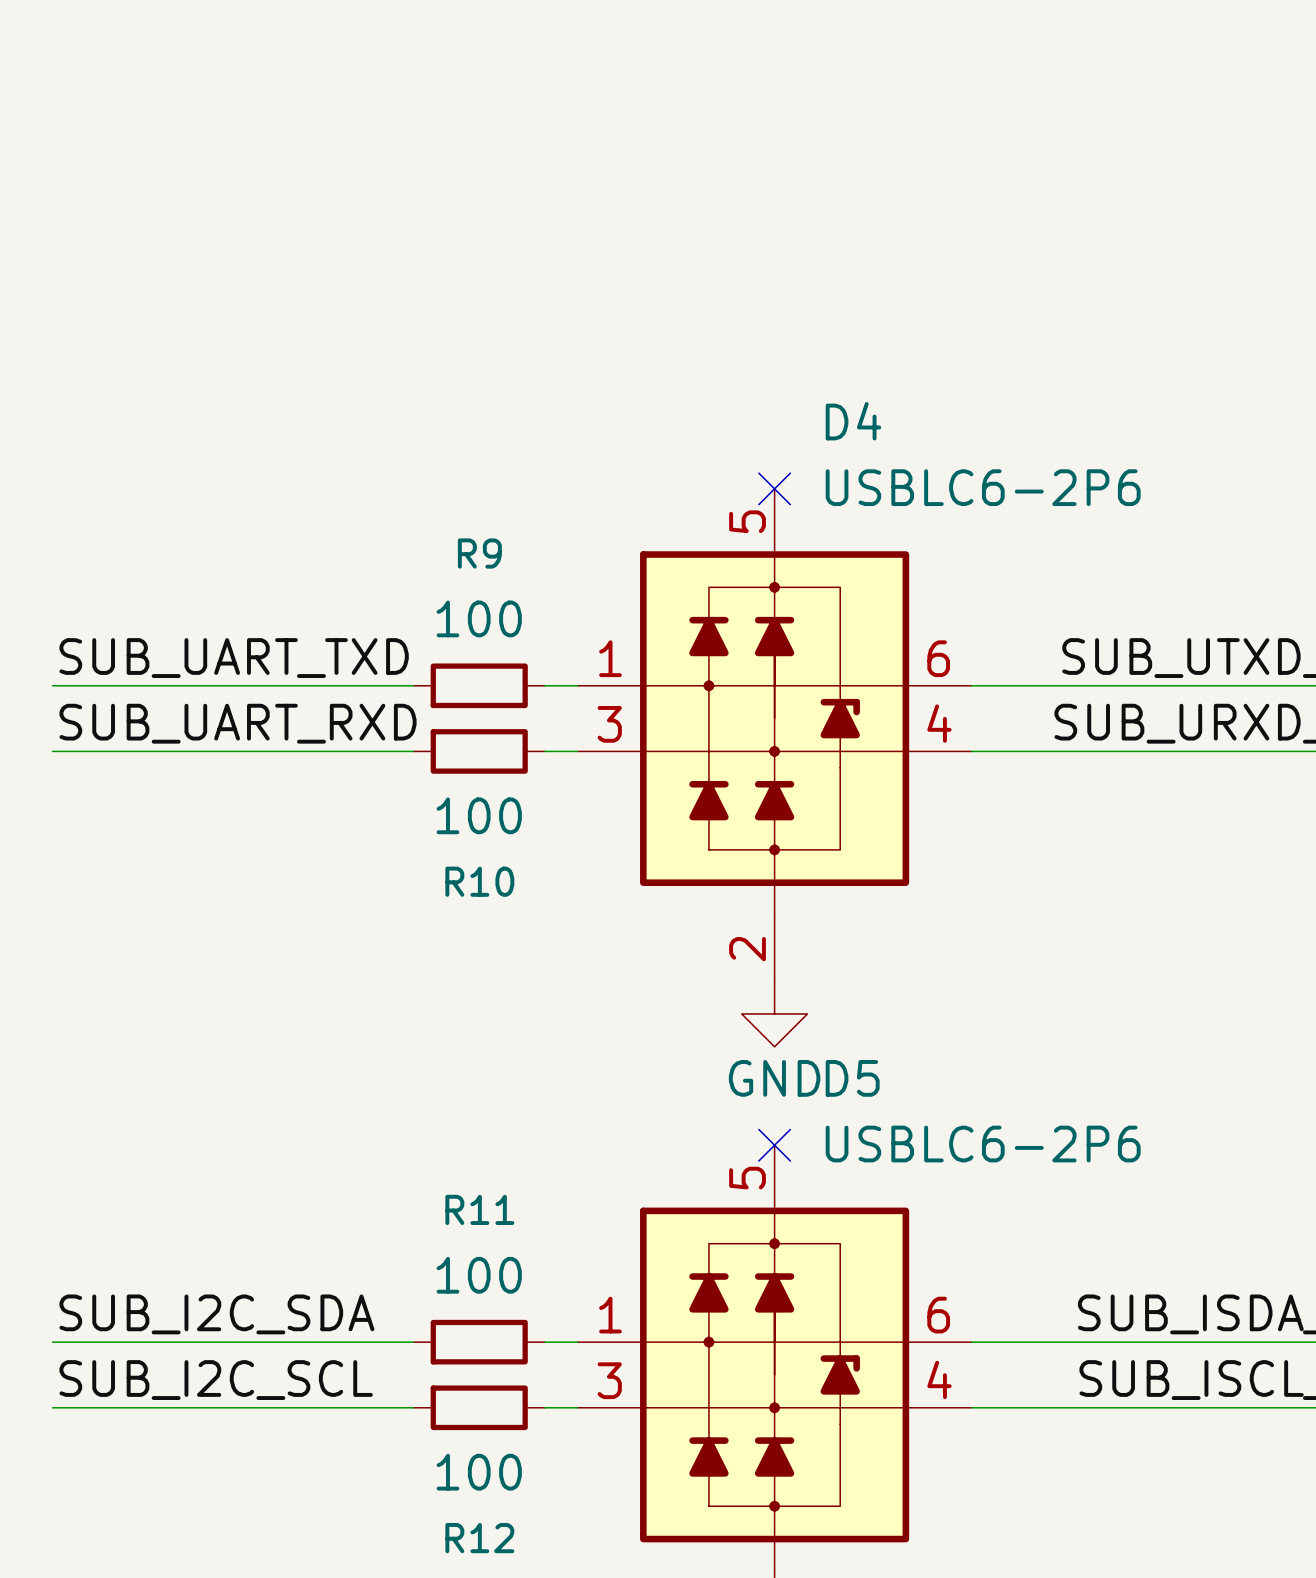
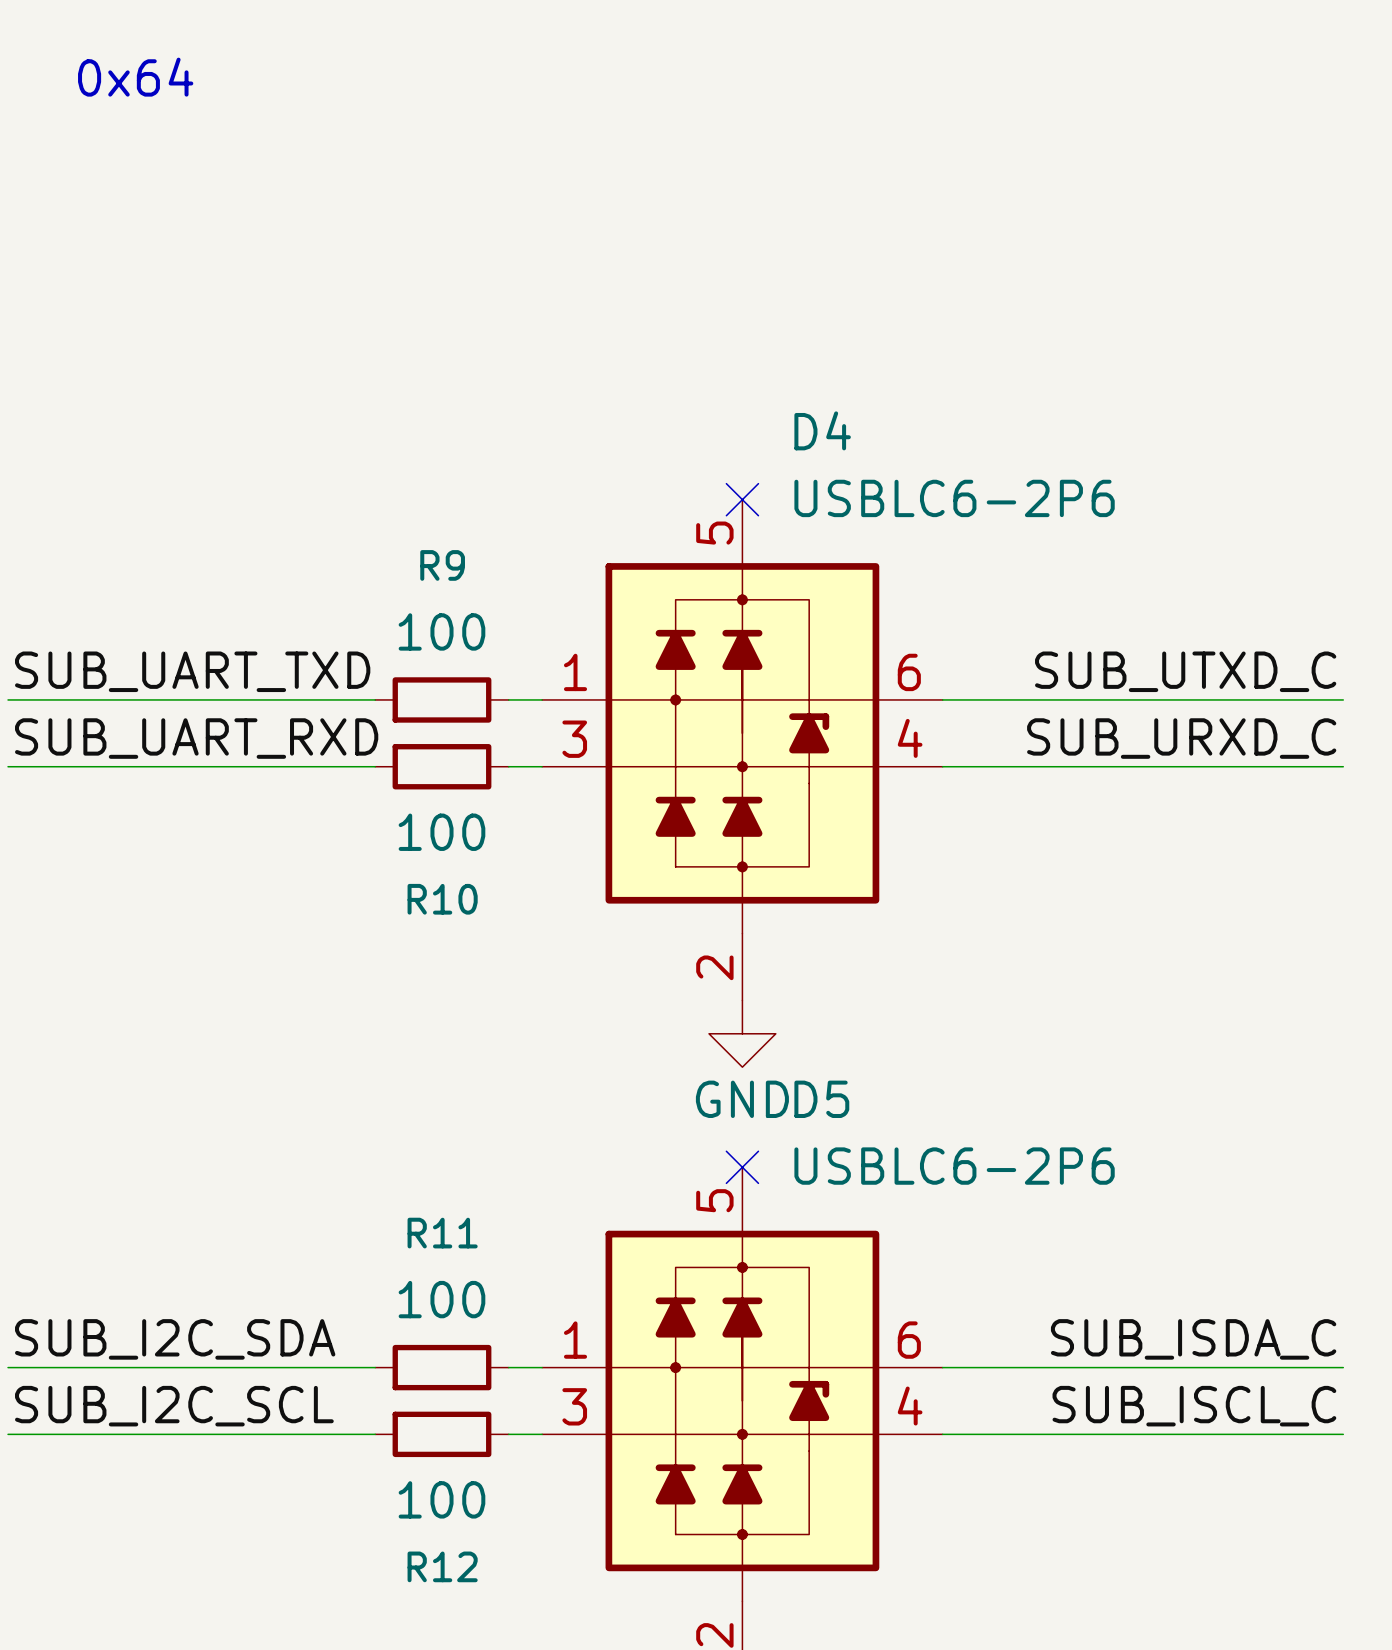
text: none -> 0x64 (135, 77)

